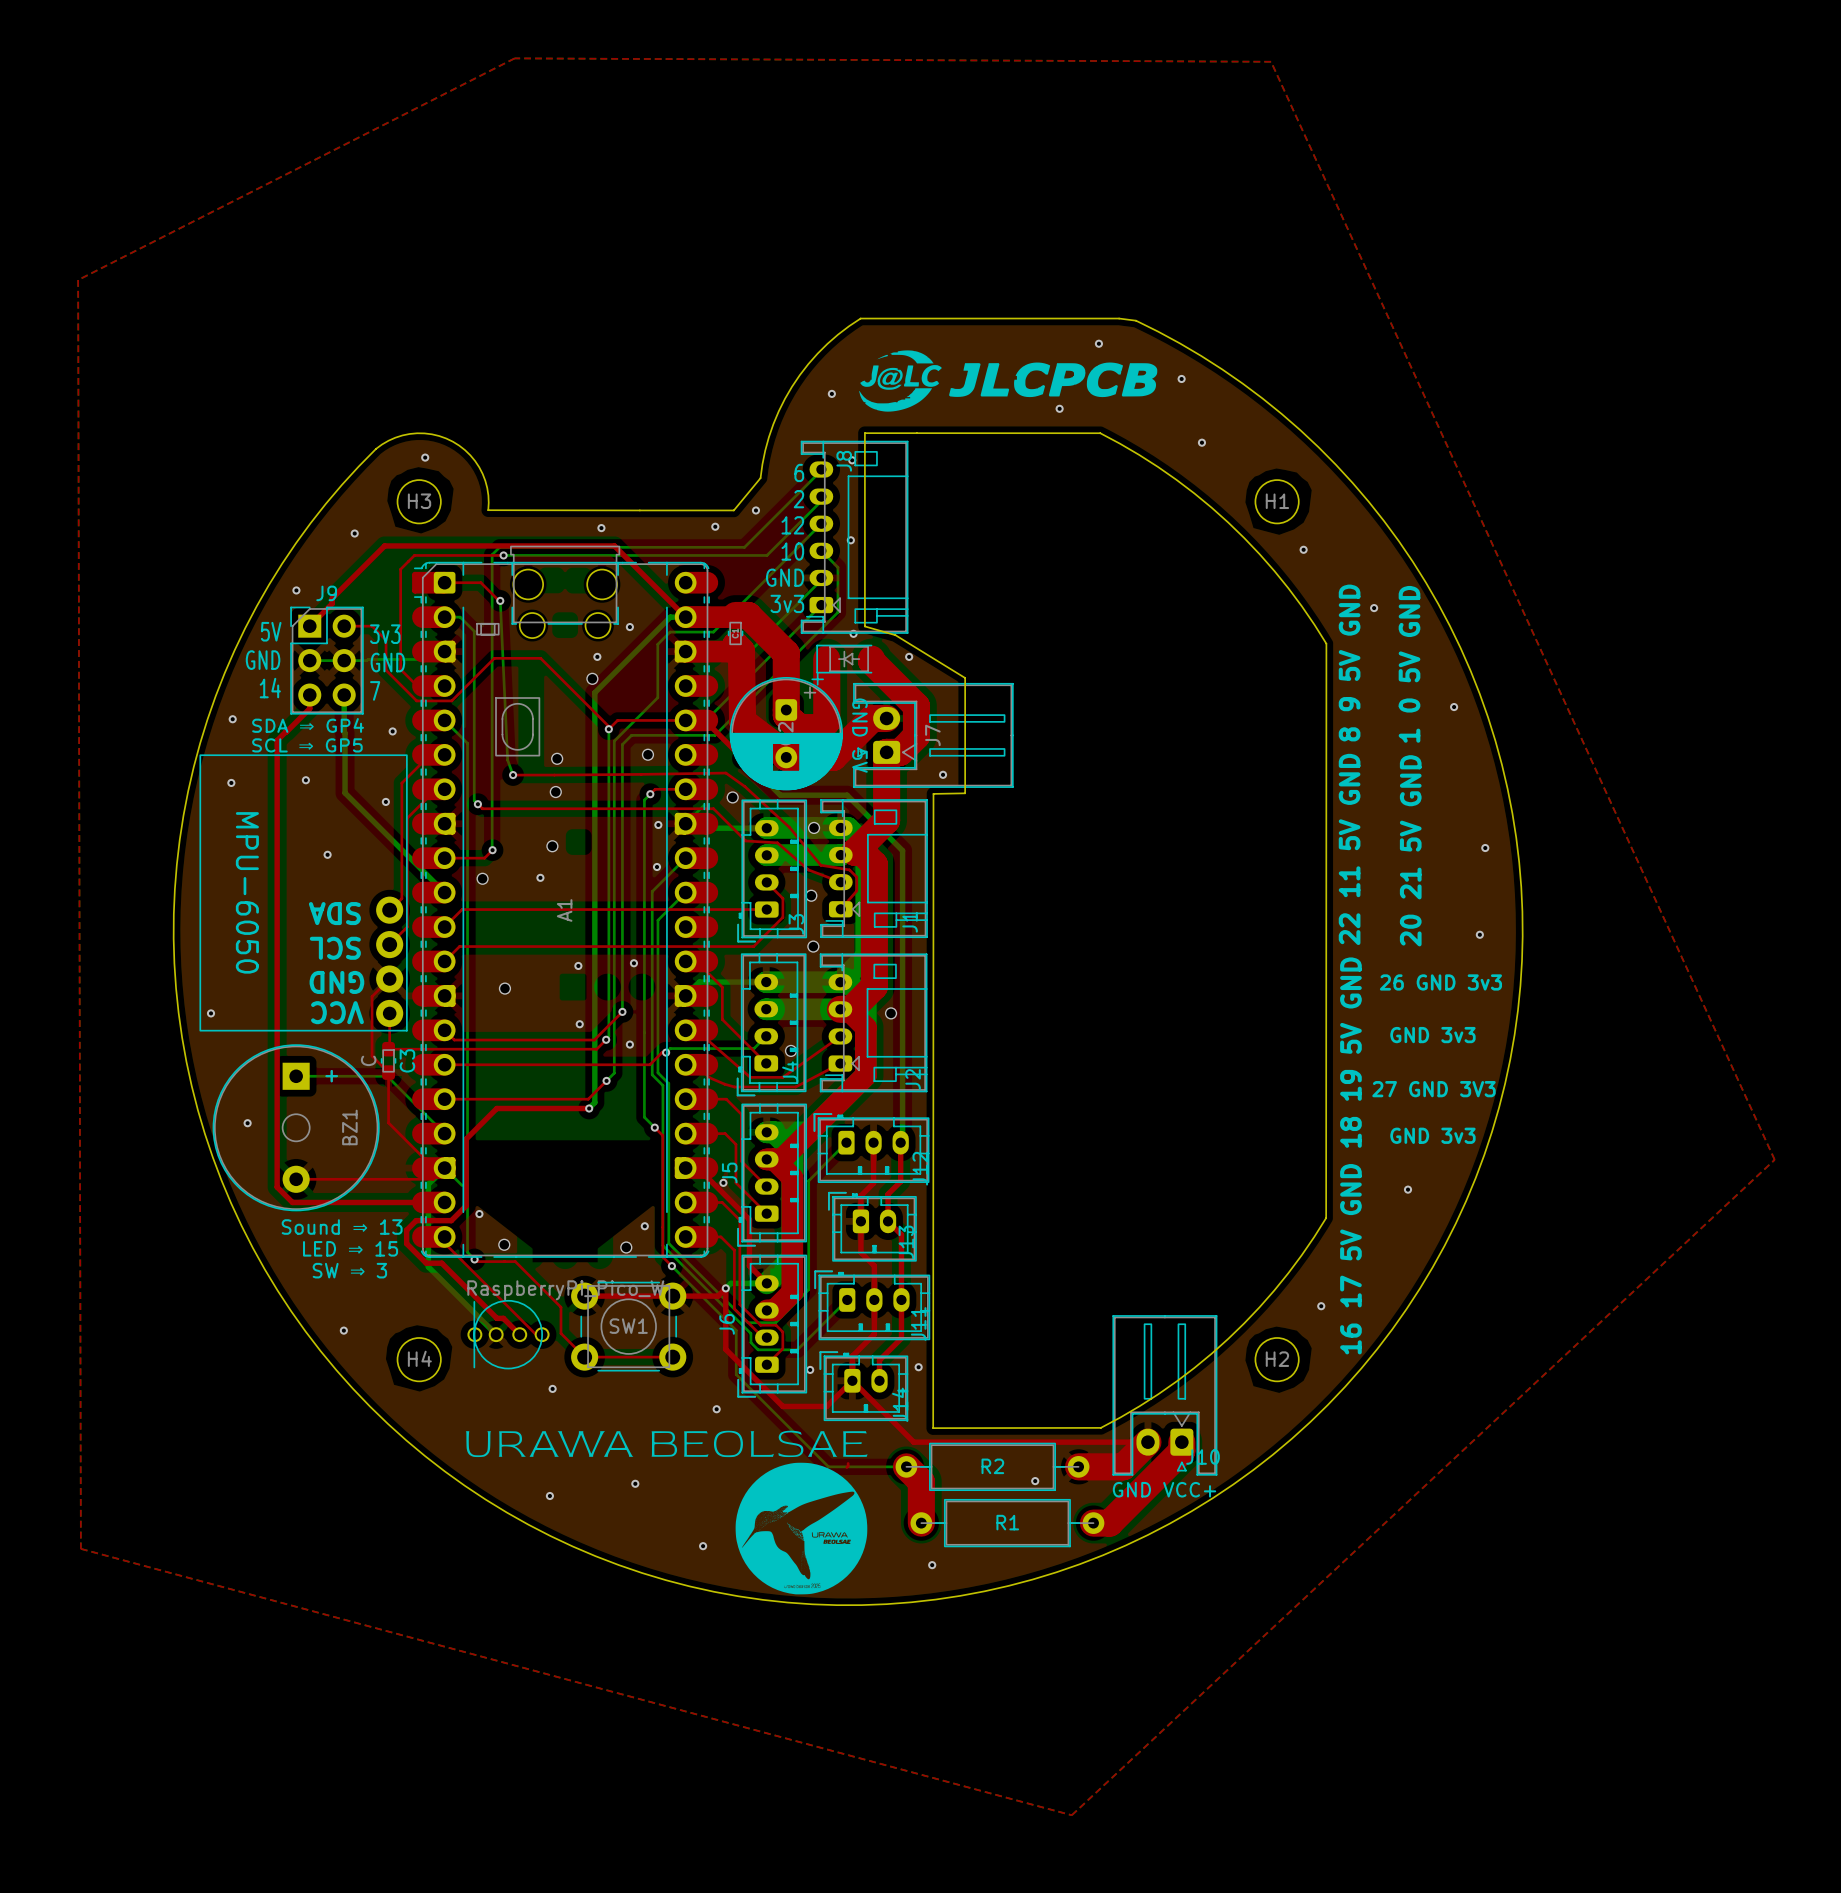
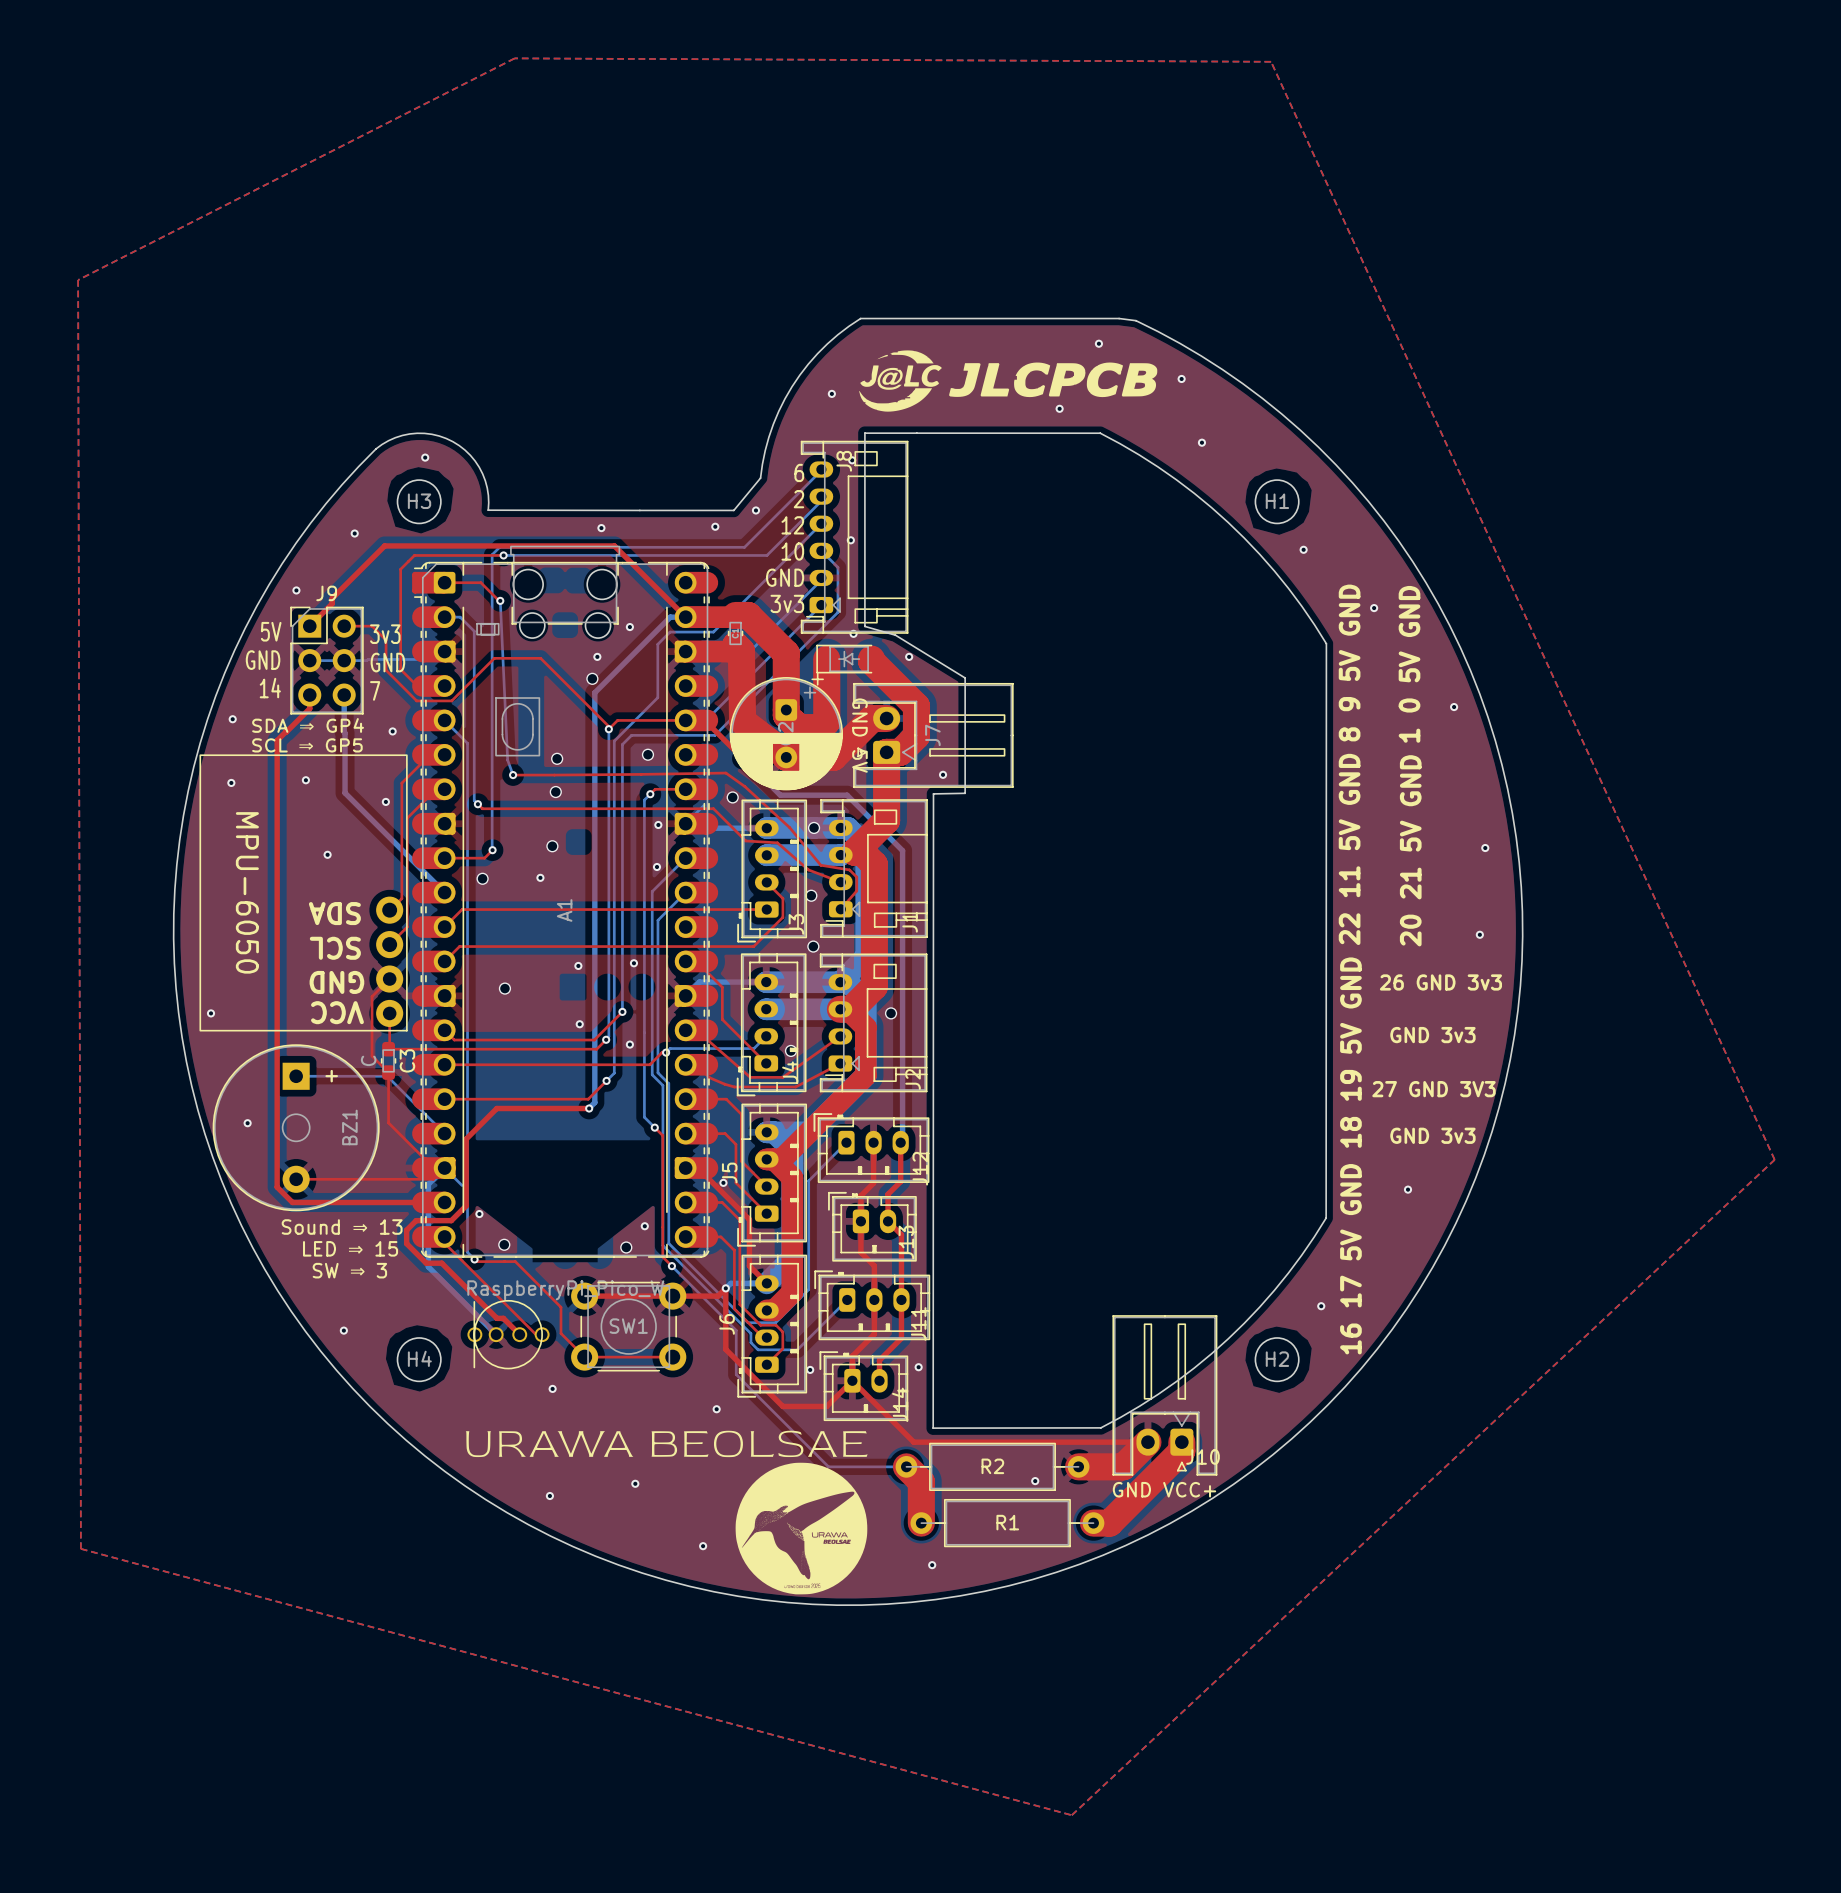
top track: (848, 1463) (846, 1467) -> none

